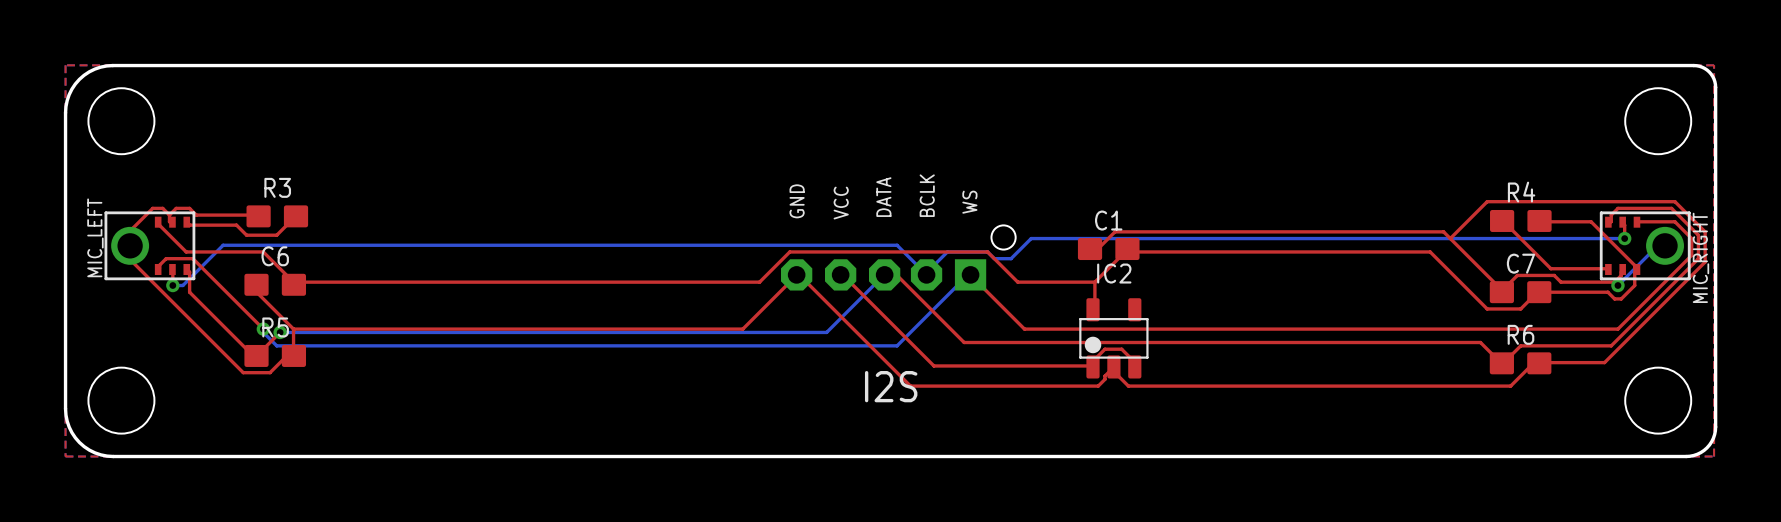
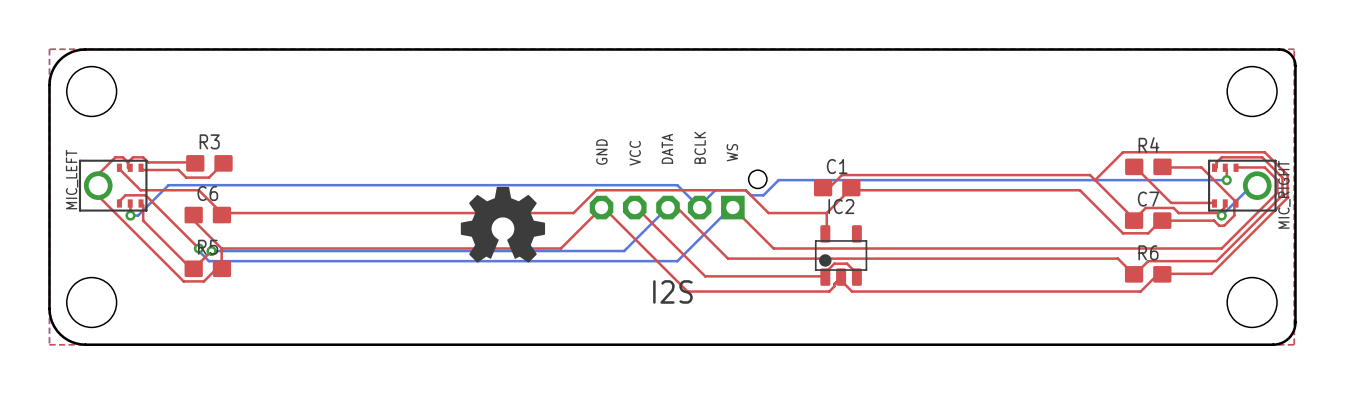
drawing: none -> [460, 186, 546, 263]

